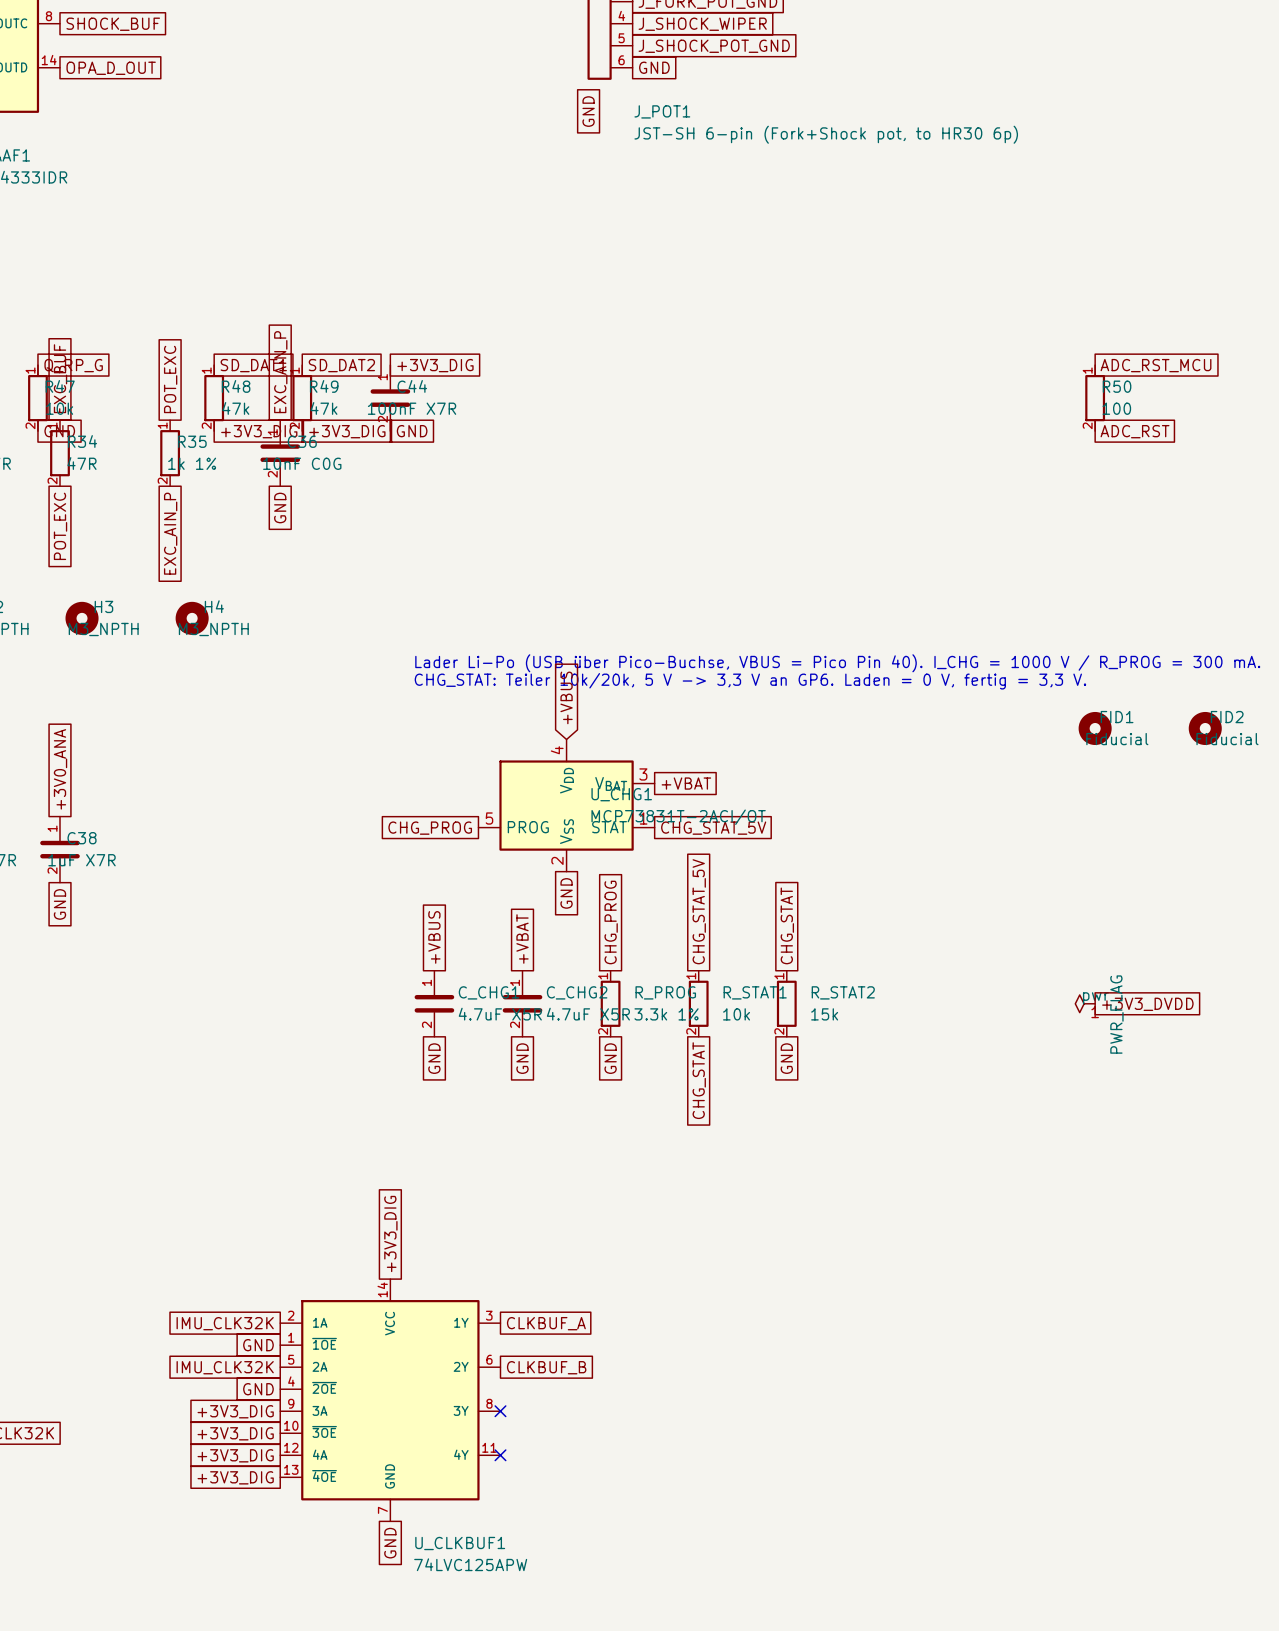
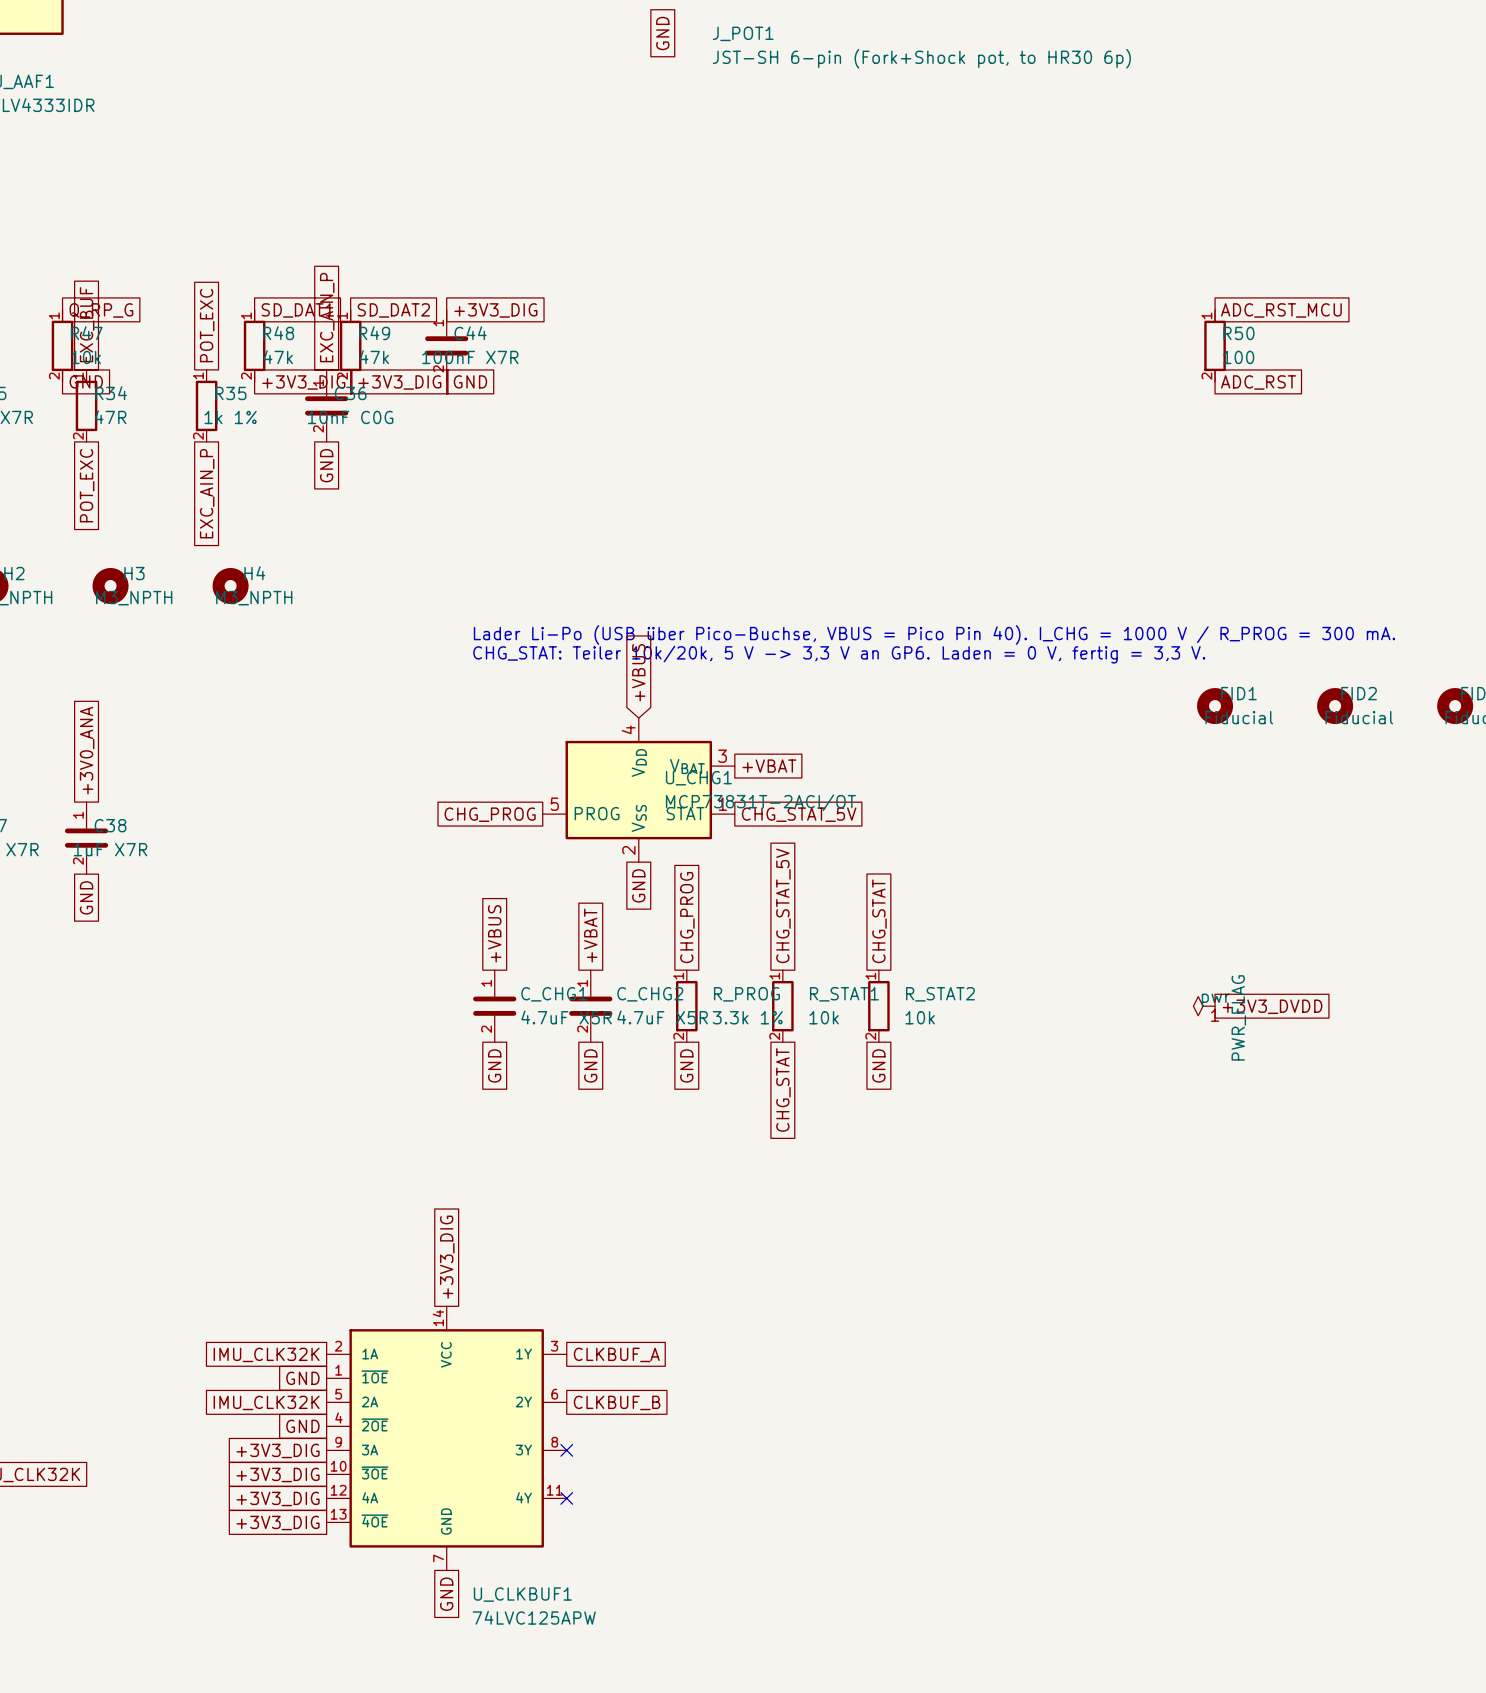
R_STAT2 value: 15k (824, 1014) -> 10k (920, 1017)

